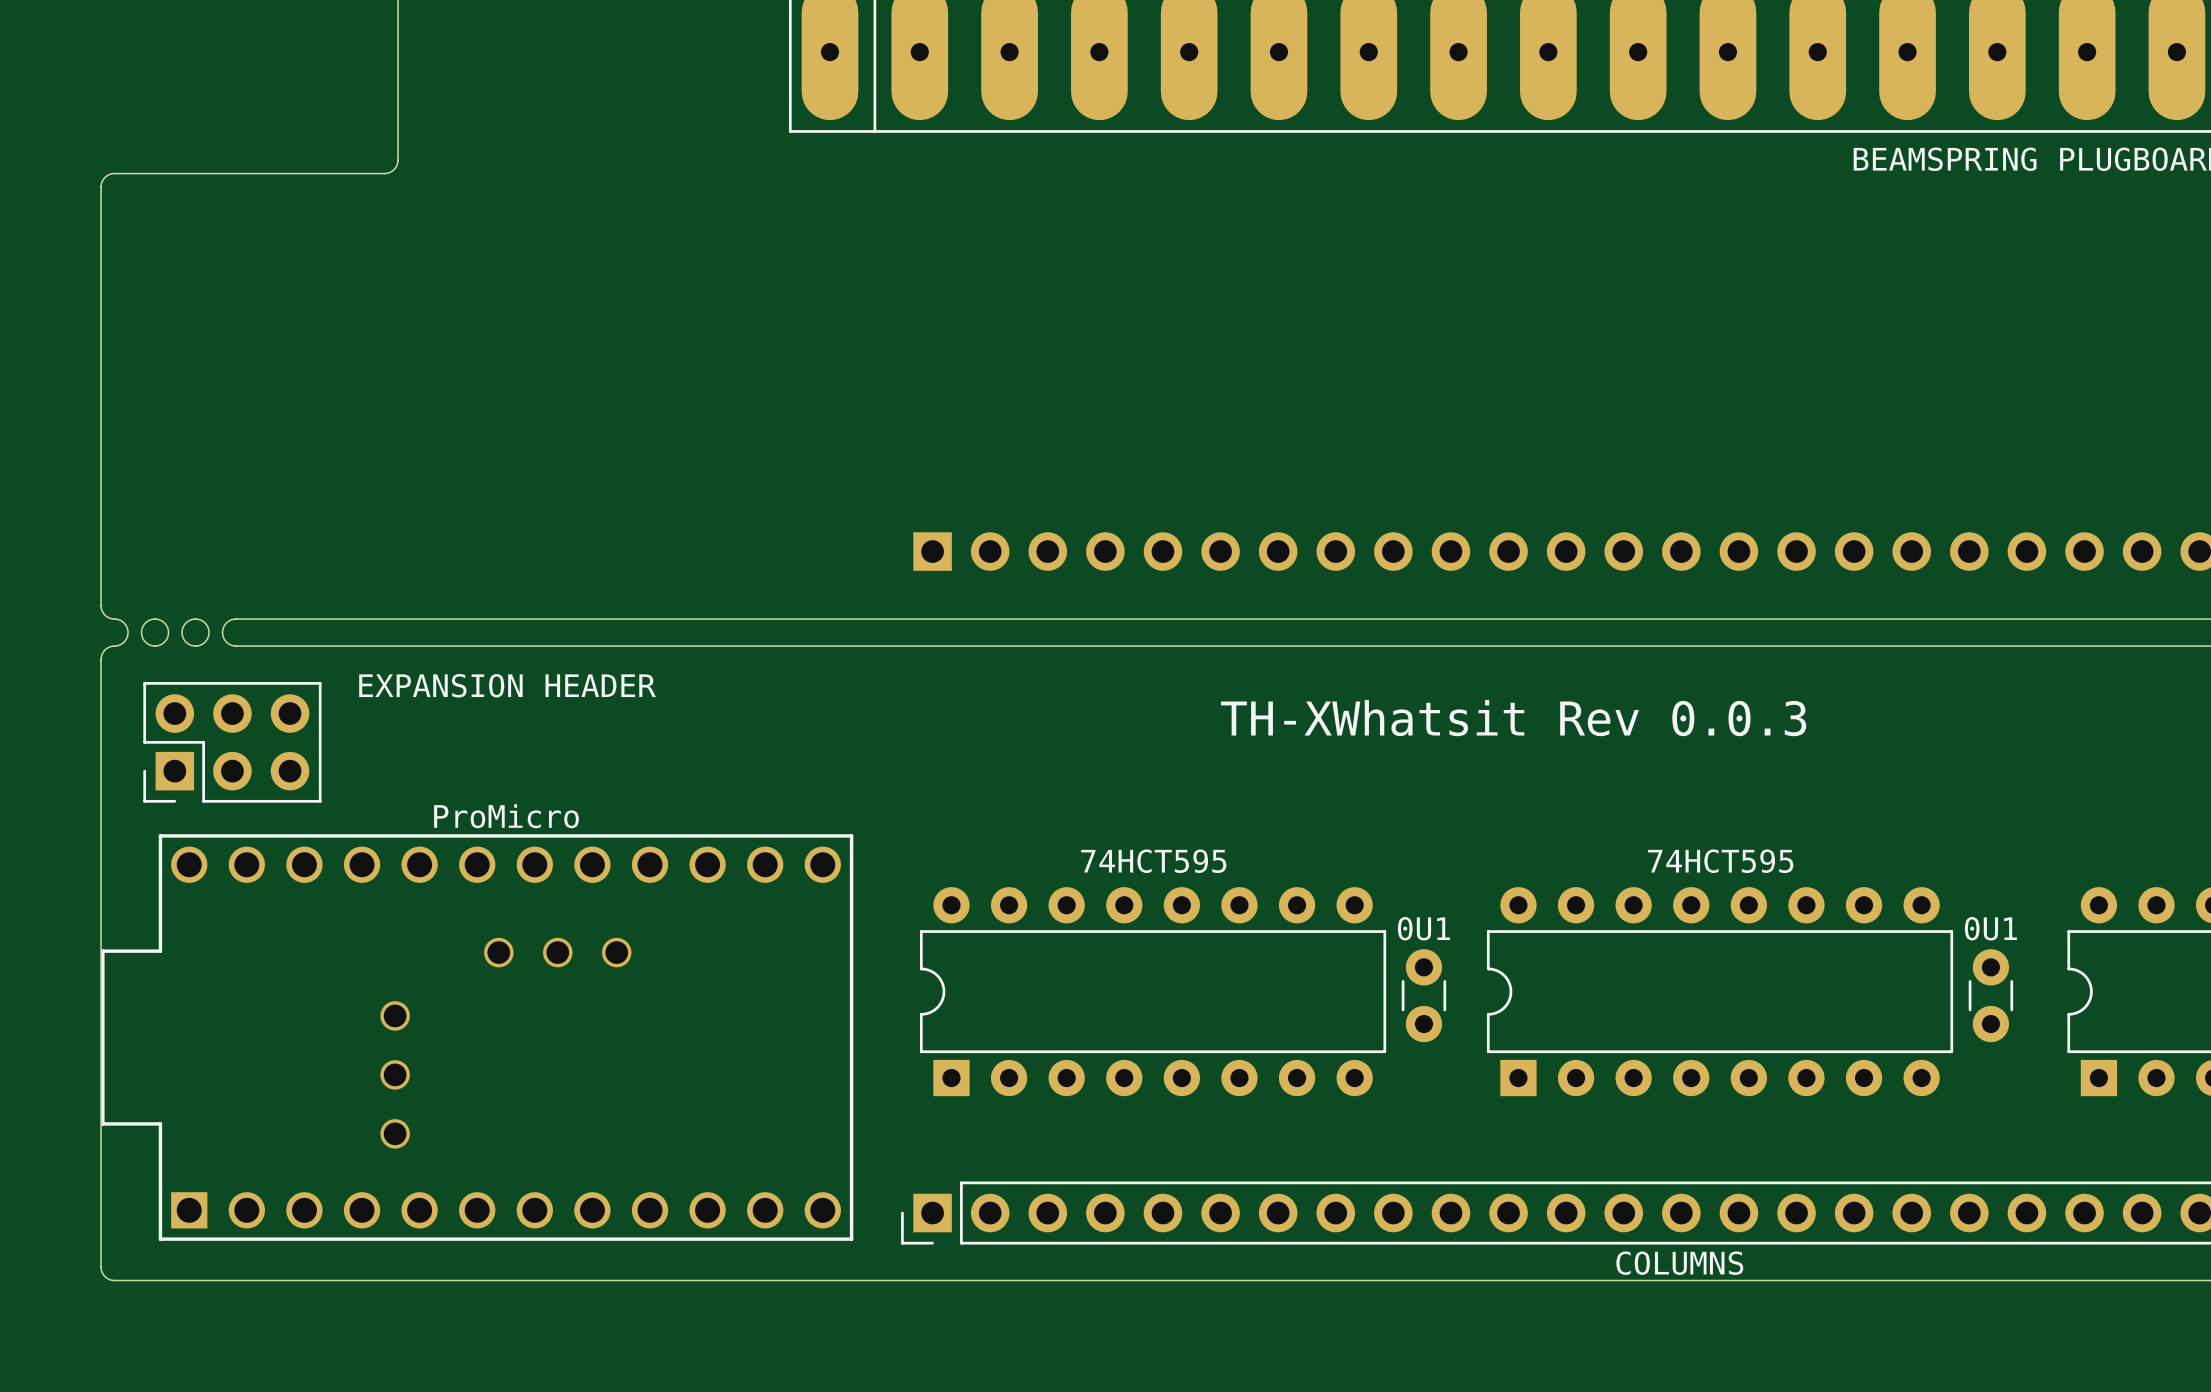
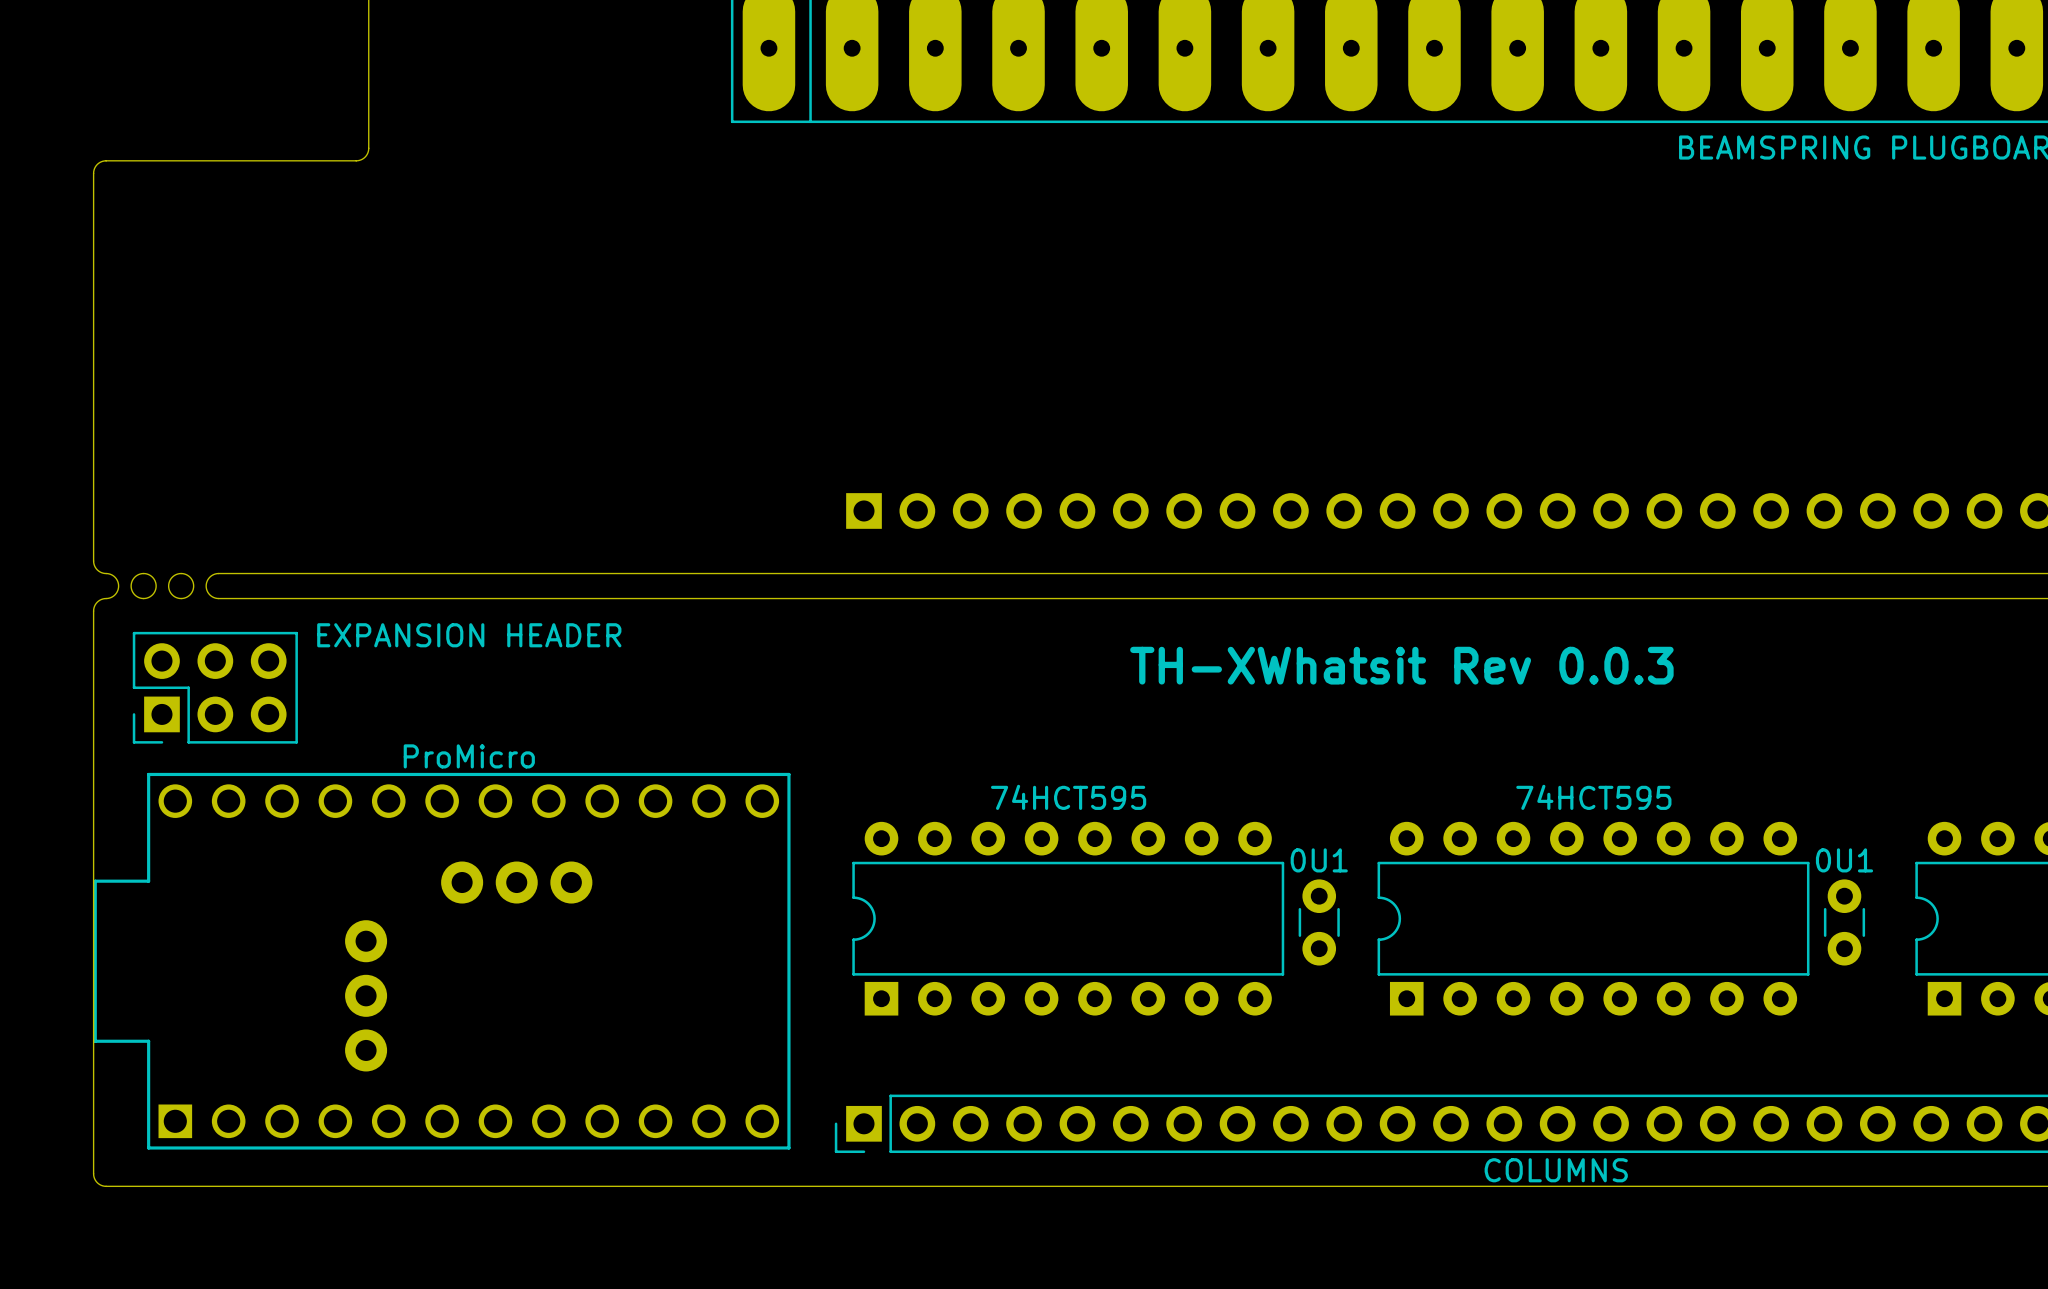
part footprint: [484, 937, 632, 968] -> [441, 861, 593, 904]
part footprint: [380, 1001, 410, 1149] -> [345, 920, 388, 1072]

